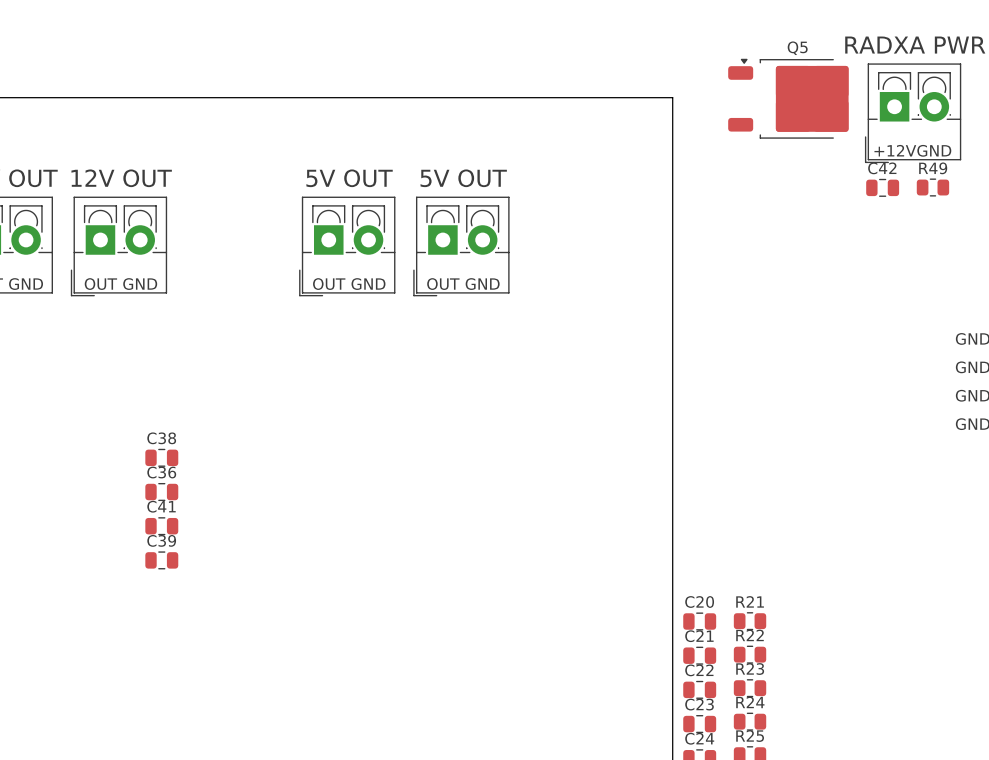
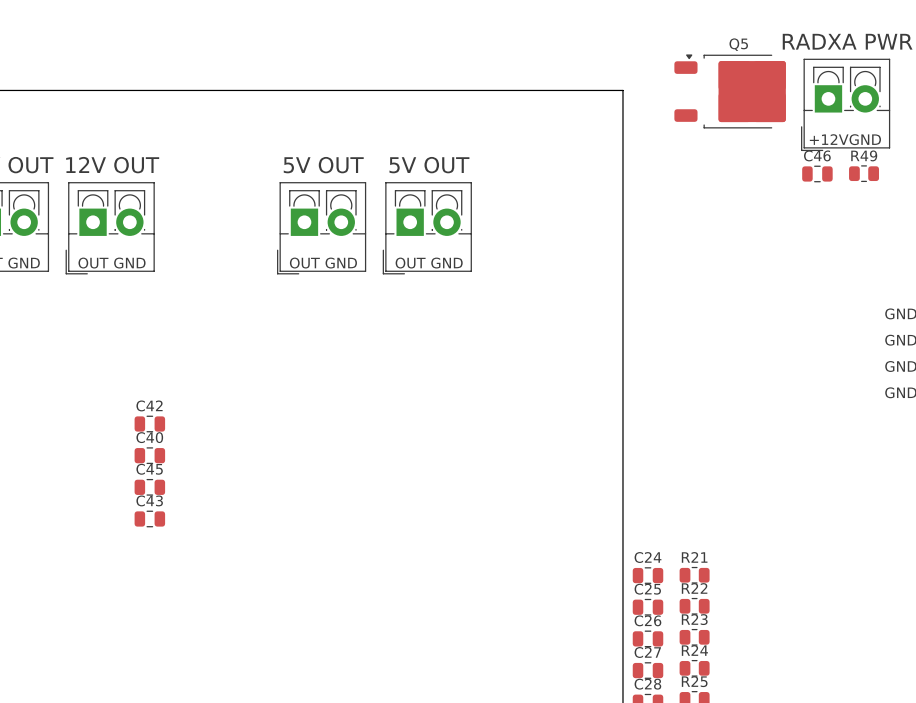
C42 name: C42 (882, 168) -> C46 (817, 155)
C38 name: C38 (161, 438) -> C42 (149, 405)
C36 name: C36 (161, 472) -> C40 (149, 437)
C41 name: C41 (161, 506) -> C45 (149, 469)
C39 name: C39 (161, 540) -> C43 (149, 500)
C20 name: C20 (699, 602) -> C24 (648, 557)
C21 name: C21 (699, 636) -> C25 (647, 589)
C22 name: C22 (699, 670) -> C26 (647, 620)
C23 name: C23 (699, 704) -> C27 (647, 652)
C24 name: C24 (699, 738) -> C28 (647, 684)

